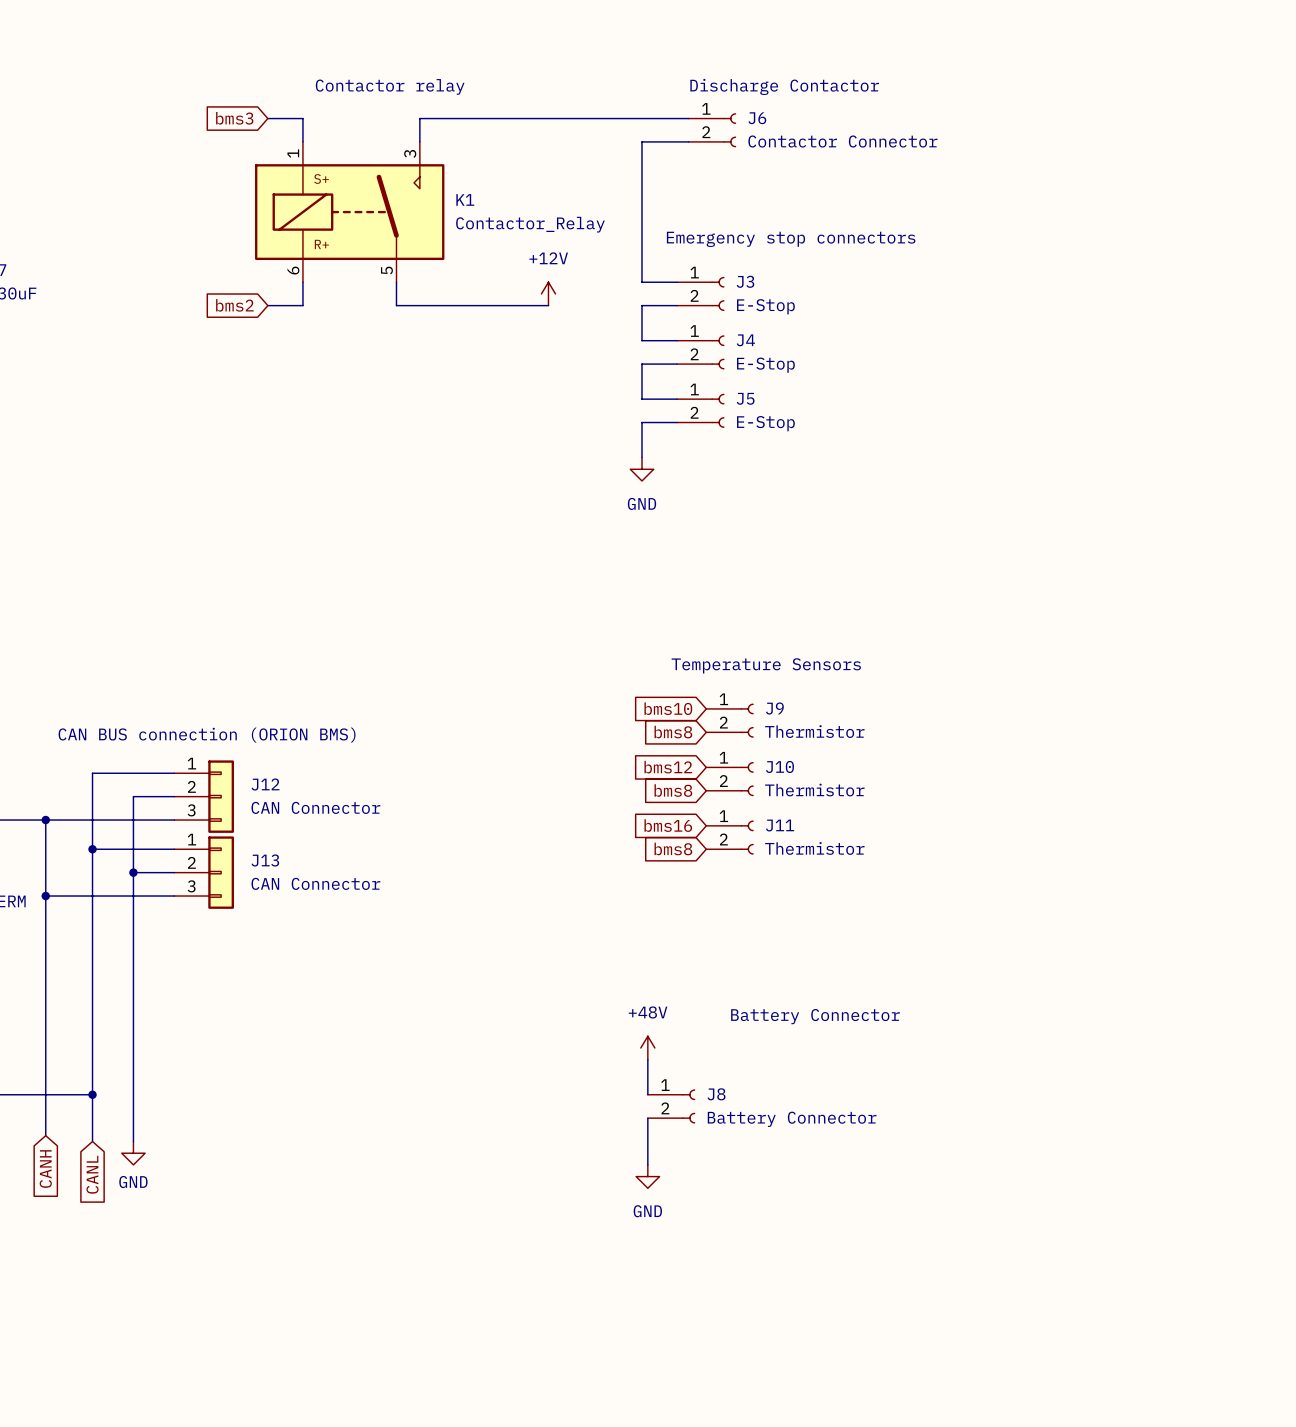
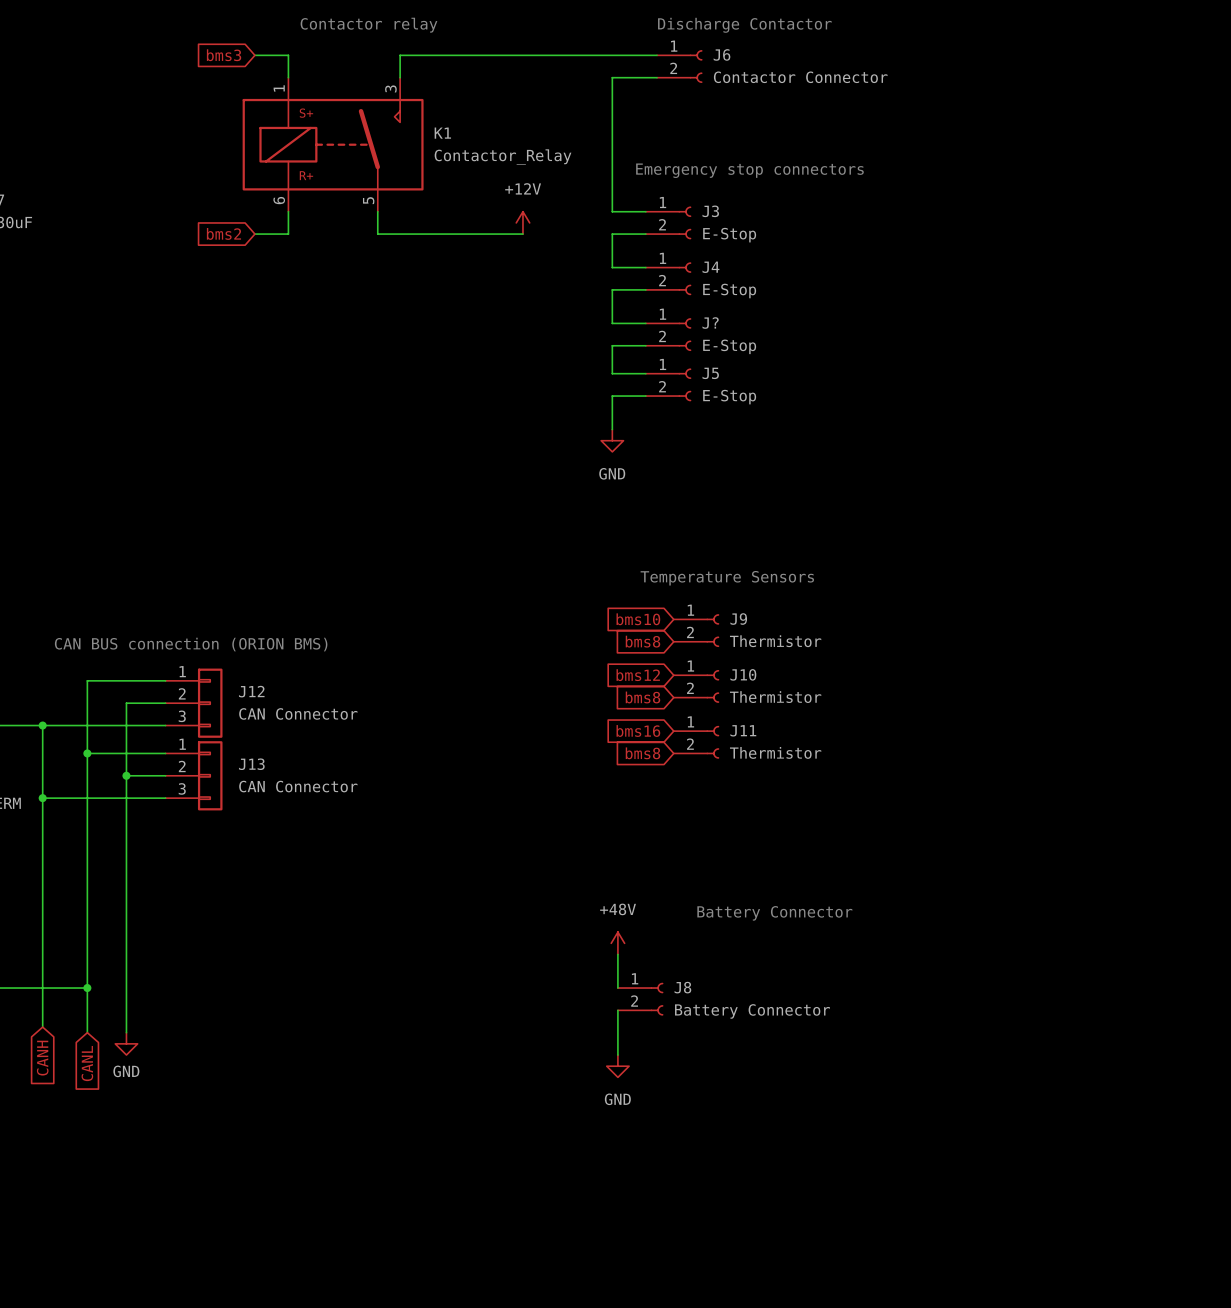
J5 name: J5 (745, 398) -> J? (710, 323)
wire: (641, 451) (641, 457) -> (612, 373) (645, 373)
J5: none -> E-Stop (668, 384)
power symbol position: GND (641, 469) -> GND (612, 440)
wire: none -> (645, 396) (612, 396) (612, 429)

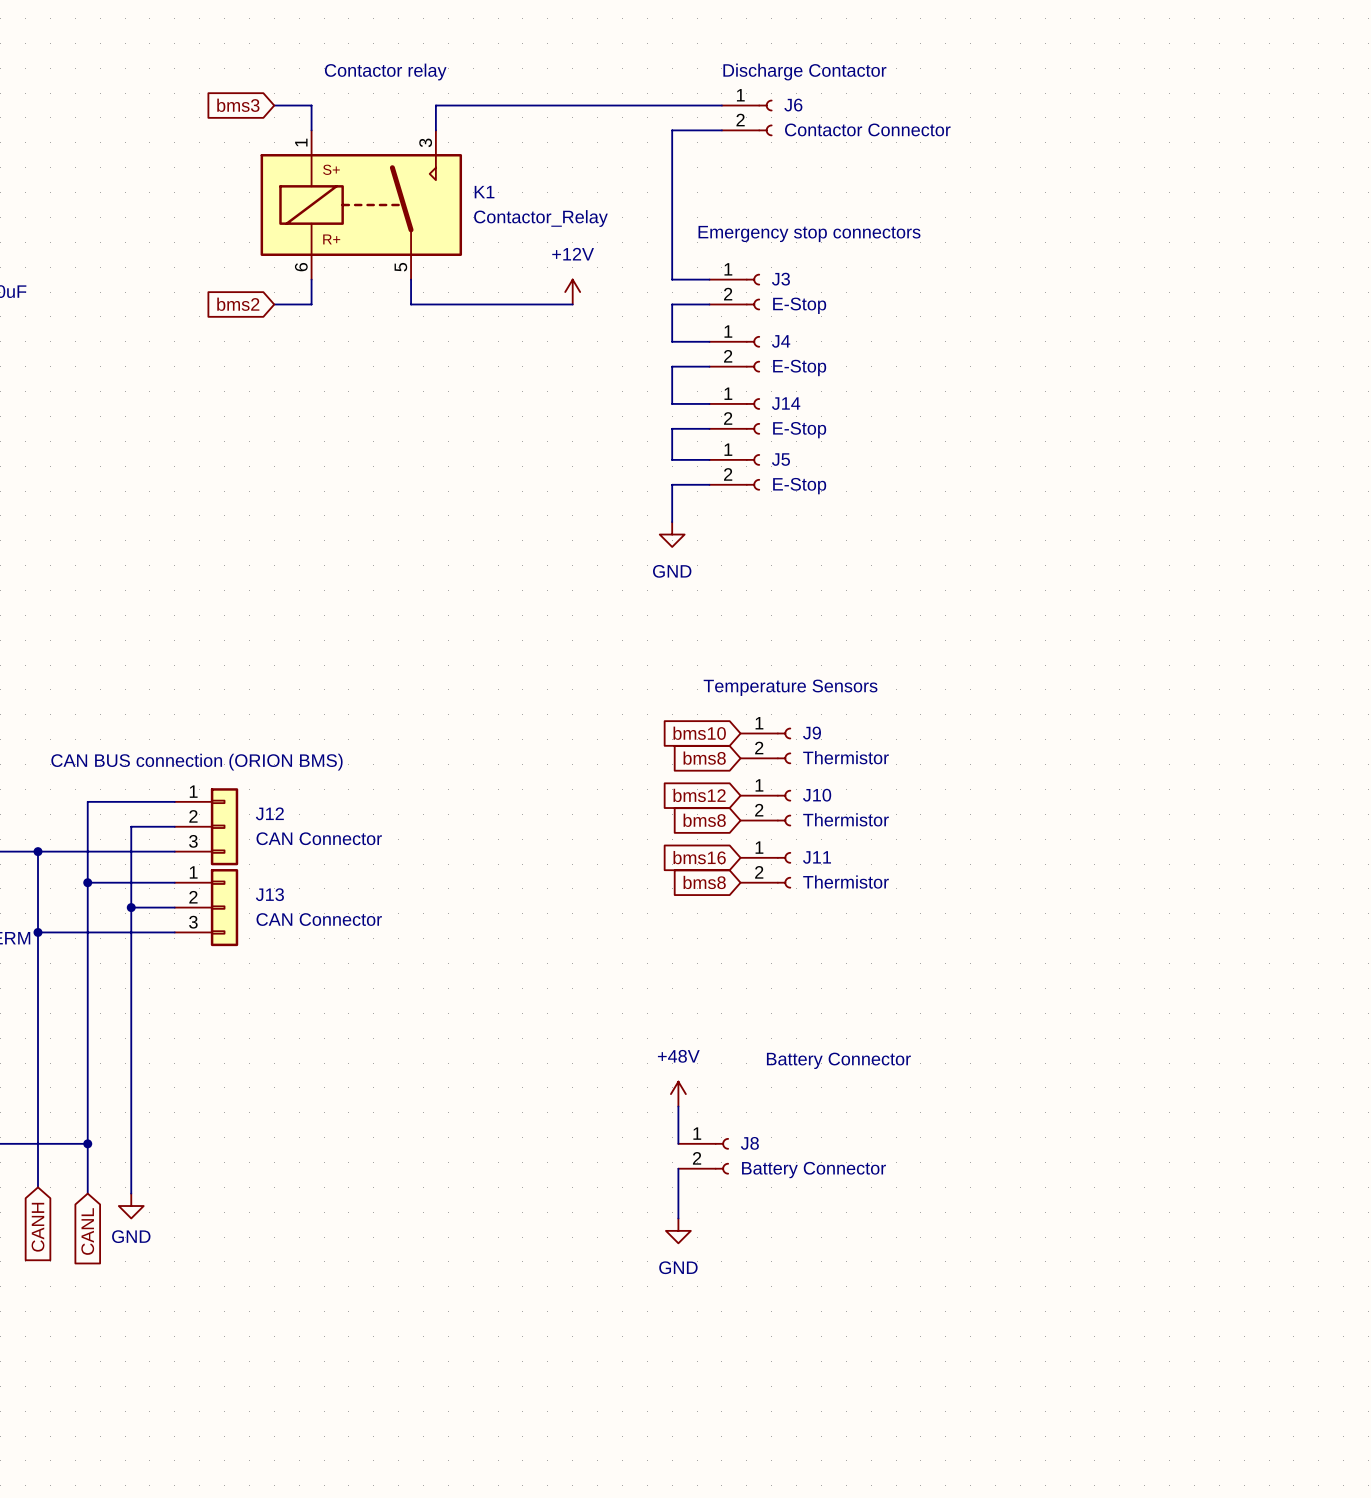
J? name: J? (710, 323) -> J14 (786, 403)

